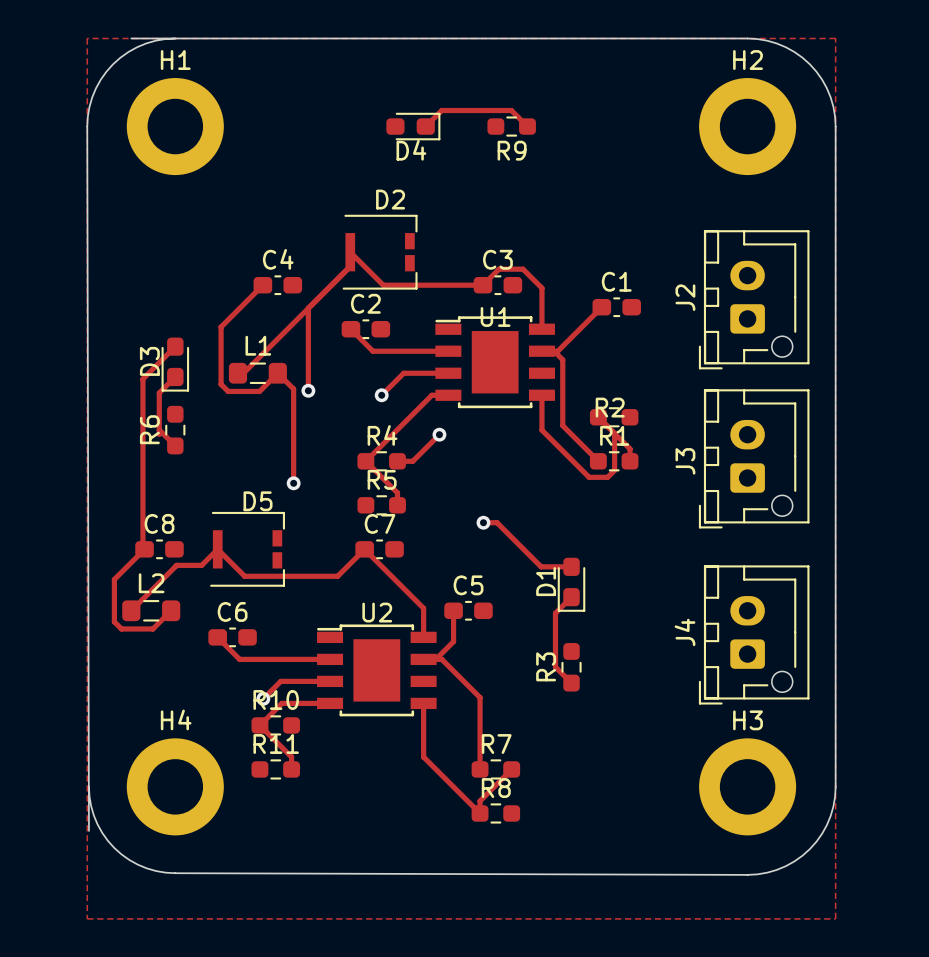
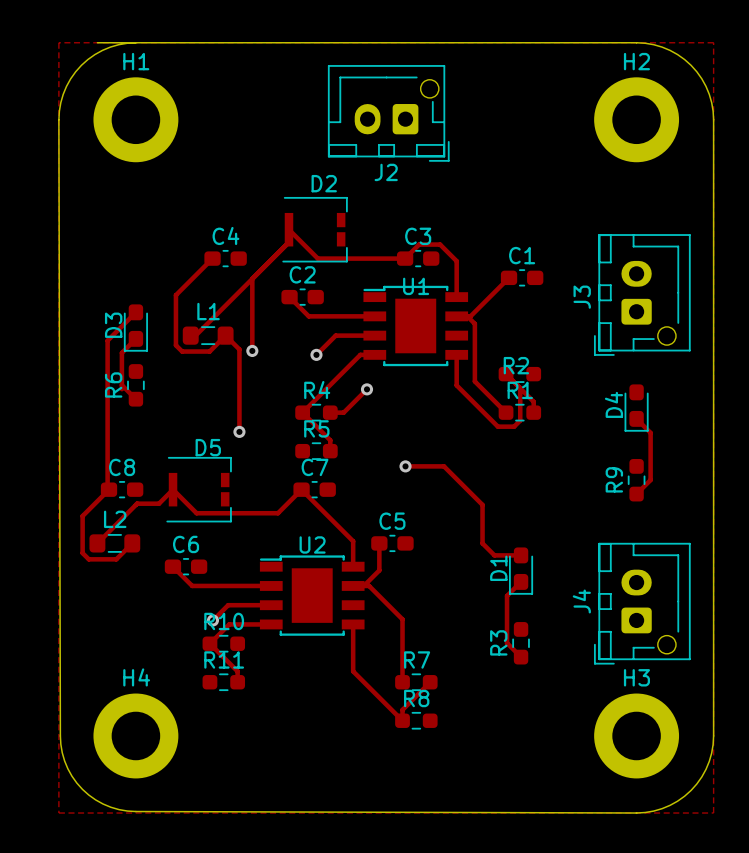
D4 rotation: 0° (413, 126) -> 90° clockwise (636, 408)
D4 position: (413, 126) -> (636, 408)
track: (425, 126) (441, 110) (511, 110) (527, 126) -> none
R9 rotation: 0° (511, 126) -> 90° clockwise (636, 480)
R9 position: (511, 126) -> (636, 480)
J2 rotation: 0° (754, 299) -> 90° counterclockwise (388, 113)
J2 position: (754, 299) -> (388, 113)
J3 position: (754, 458) -> (642, 294)
track: none -> (636, 418) (650, 432) (650, 480) (636, 494)
track: (497, 522) (541, 566) (571, 566) -> (417, 466) (444, 466) (482, 504) (482, 543) (494, 555) (521, 555)
D1 position: (571, 584) -> (521, 571)
track: (571, 597) (555, 613) (555, 667) (571, 683) -> (521, 581) (507, 595) (507, 643) (521, 657)
J4 position: (754, 634) -> (642, 603)
R3 position: (571, 667) -> (521, 643)
board edge: (88, 786) (91, 806) (97, 824) (114, 847) (137, 864) (165, 872) (747, 874) (776, 869) (794, 861) (809, 849) (822, 833) (830, 815) (835, 786) -> (60, 735) (62, 752) (67, 768) (82, 789) (103, 804) (127, 811) (645, 812) (662, 808) (677, 801) (691, 790) (701, 776) (709, 761) (713, 744) (713, 697)
H4 position: (175, 786) -> (135, 735)
H3 position: (747, 786) -> (636, 735)

